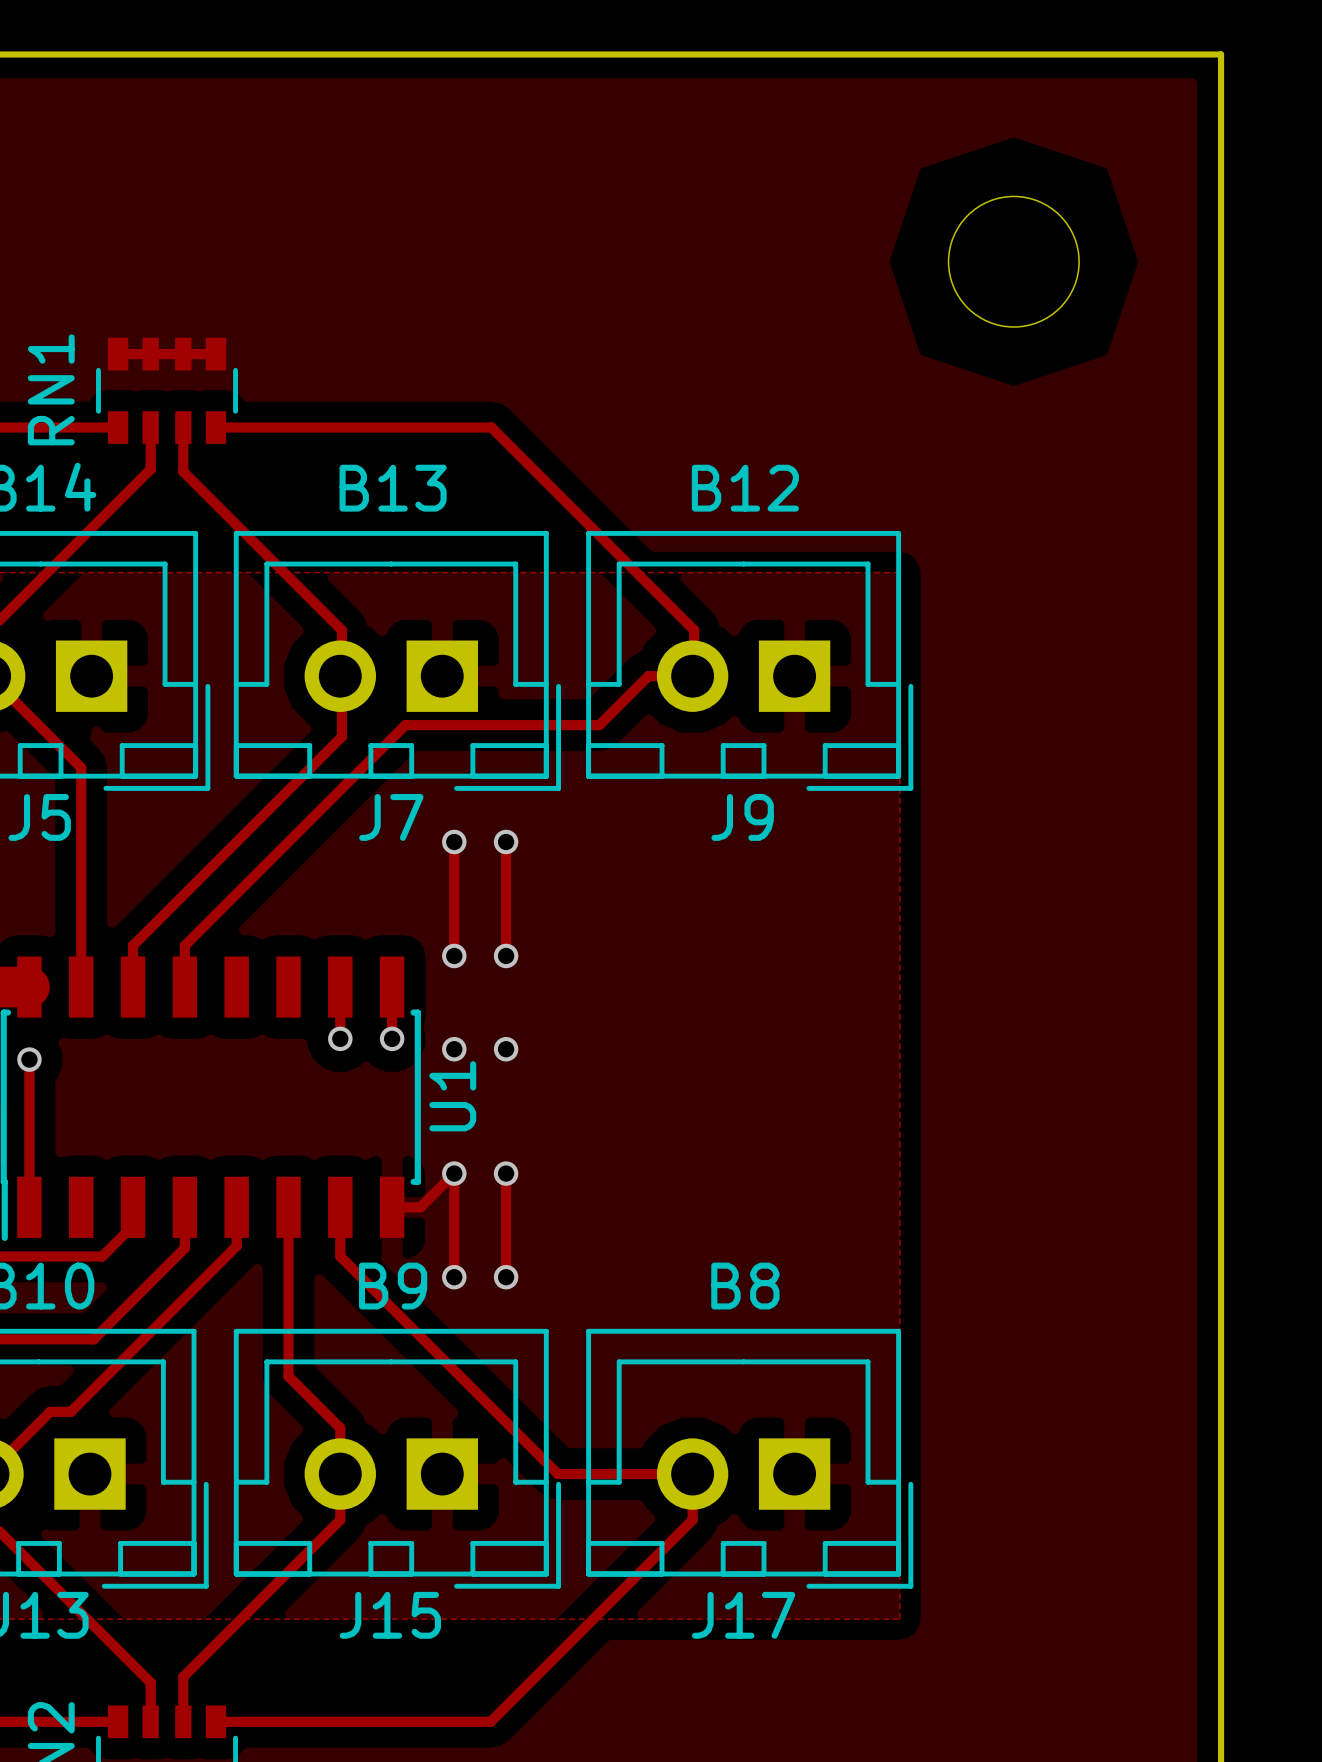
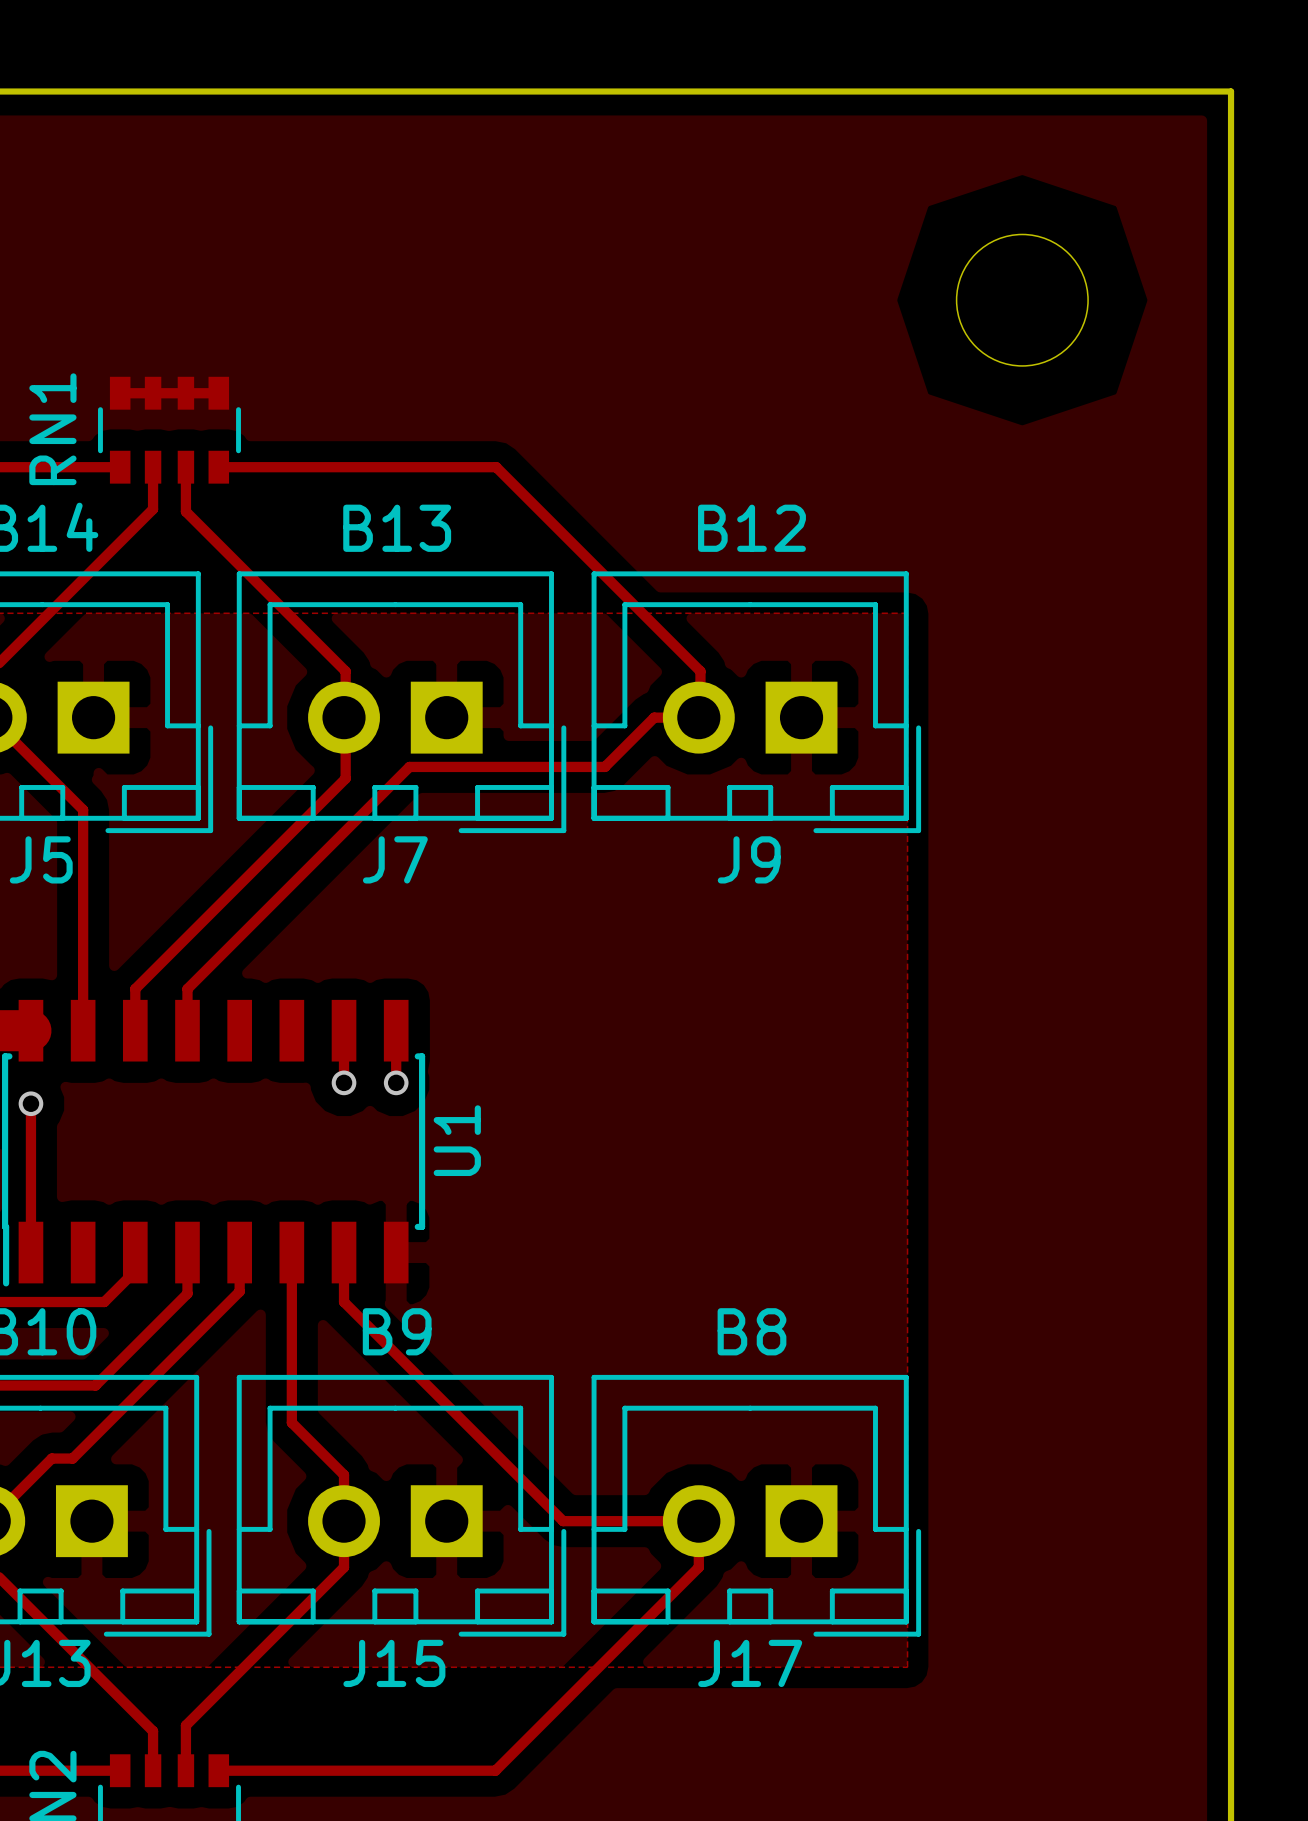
track: (454, 841) (454, 955) -> none
via: (454, 841) -> none
track: (506, 841) (506, 955) -> none
via: (506, 841) -> none
via: (454, 955) -> none
via: (506, 955) -> none
via: (454, 1049) -> none
via: (506, 1049) -> none
via: (454, 1173) -> none
track: (506, 1173) (506, 1277) -> none
via: (506, 1173) -> none
track: (392, 1207) (420, 1207) (454, 1173) (454, 1277) -> none
via: (454, 1277) -> none
via: (506, 1277) -> none

